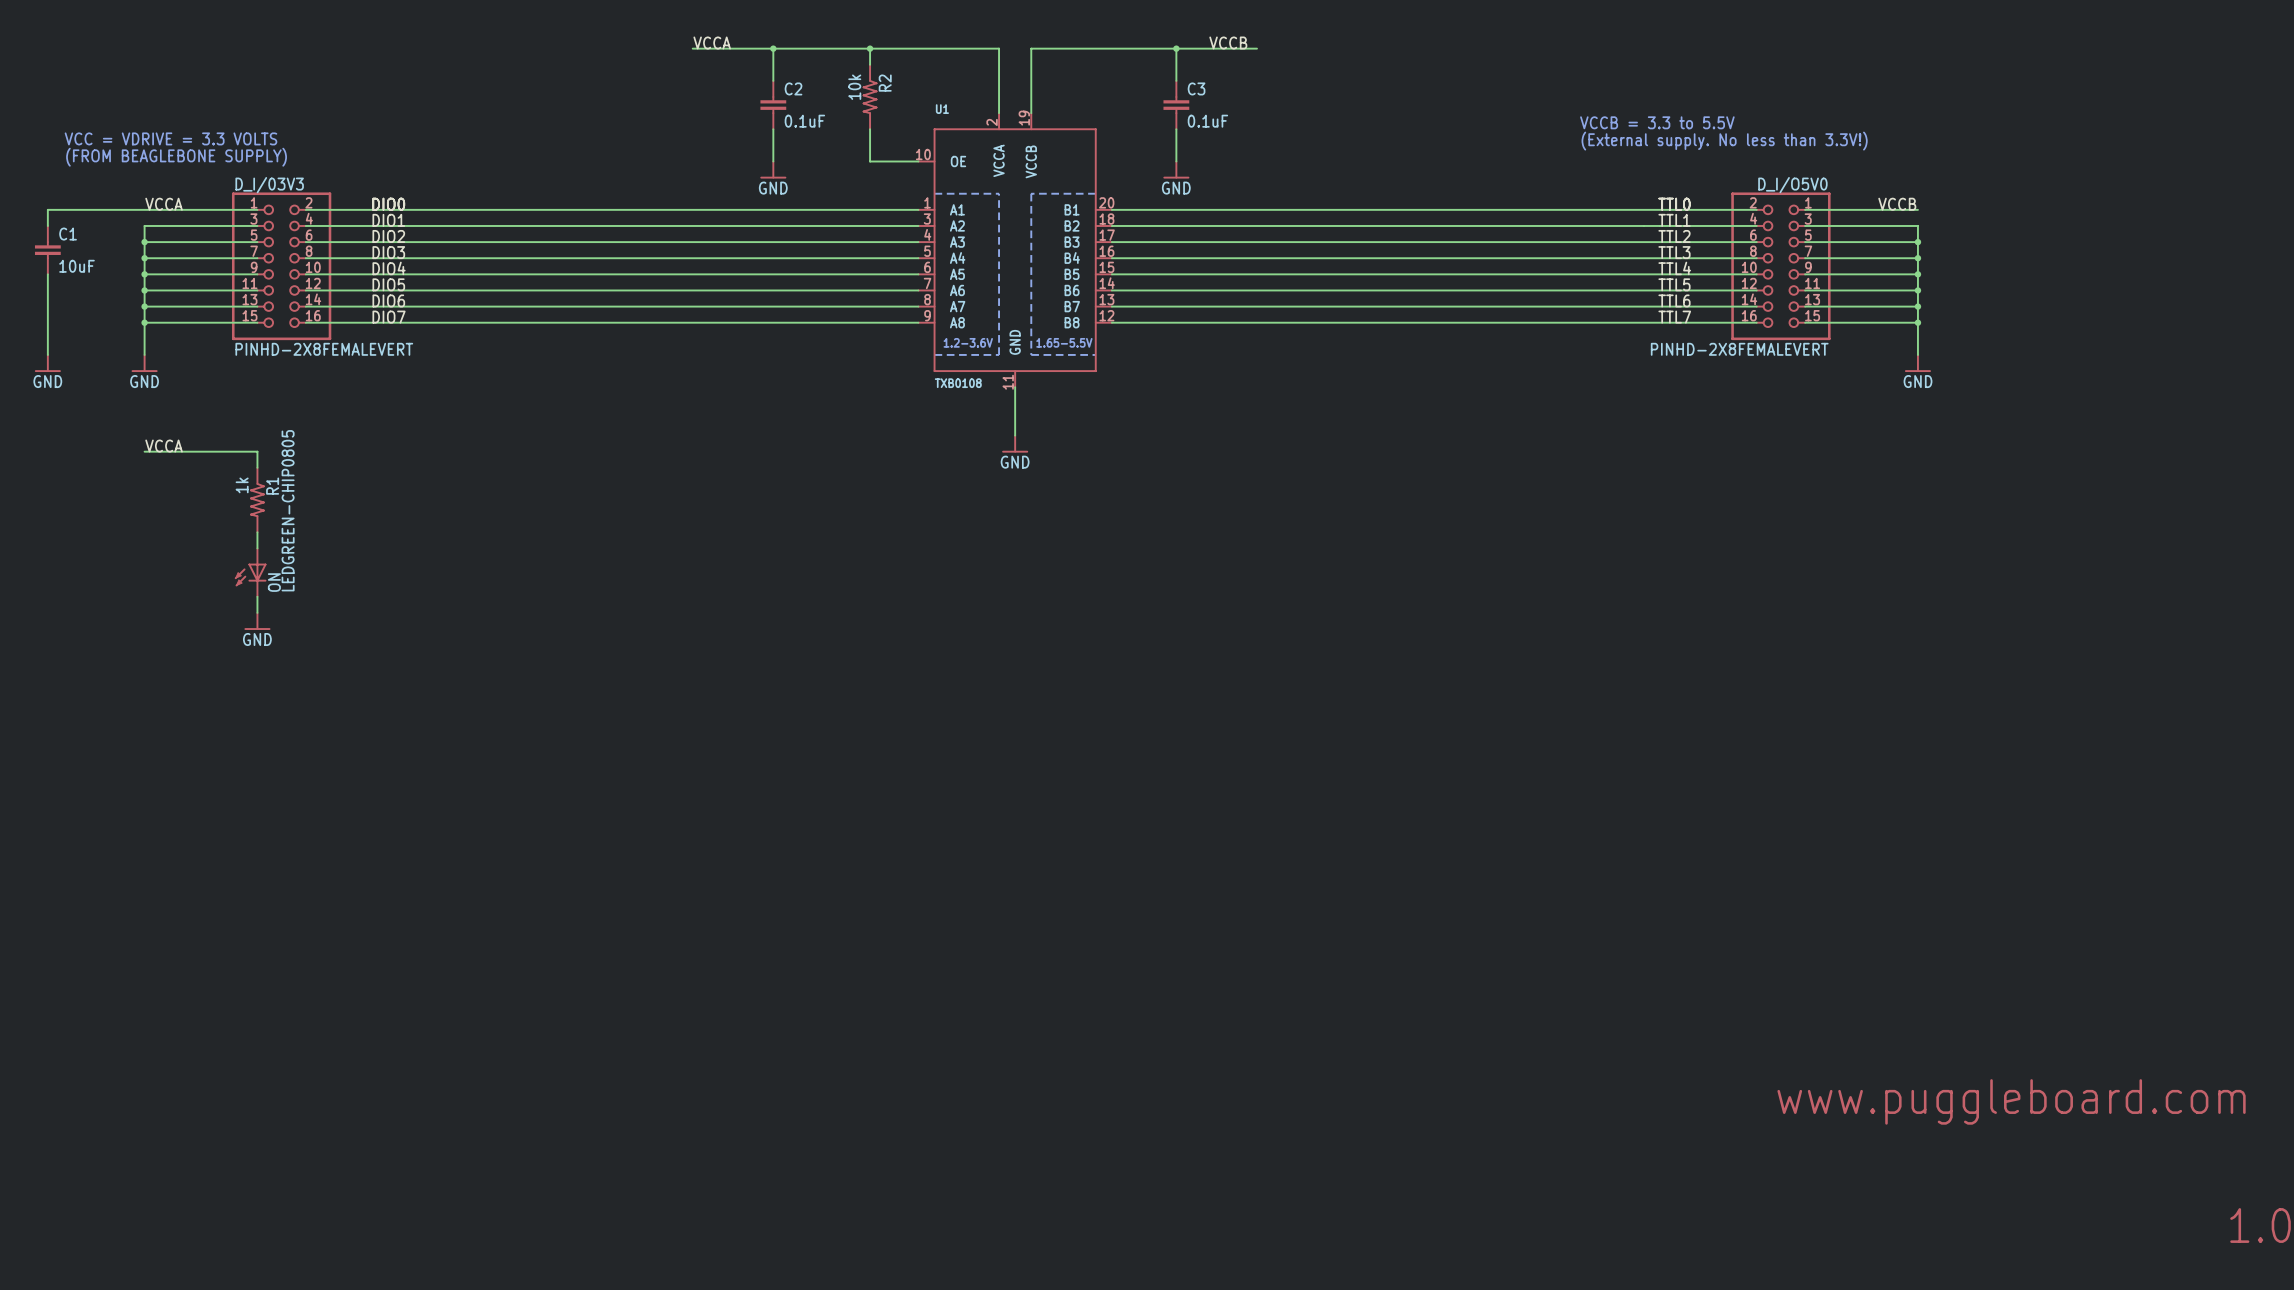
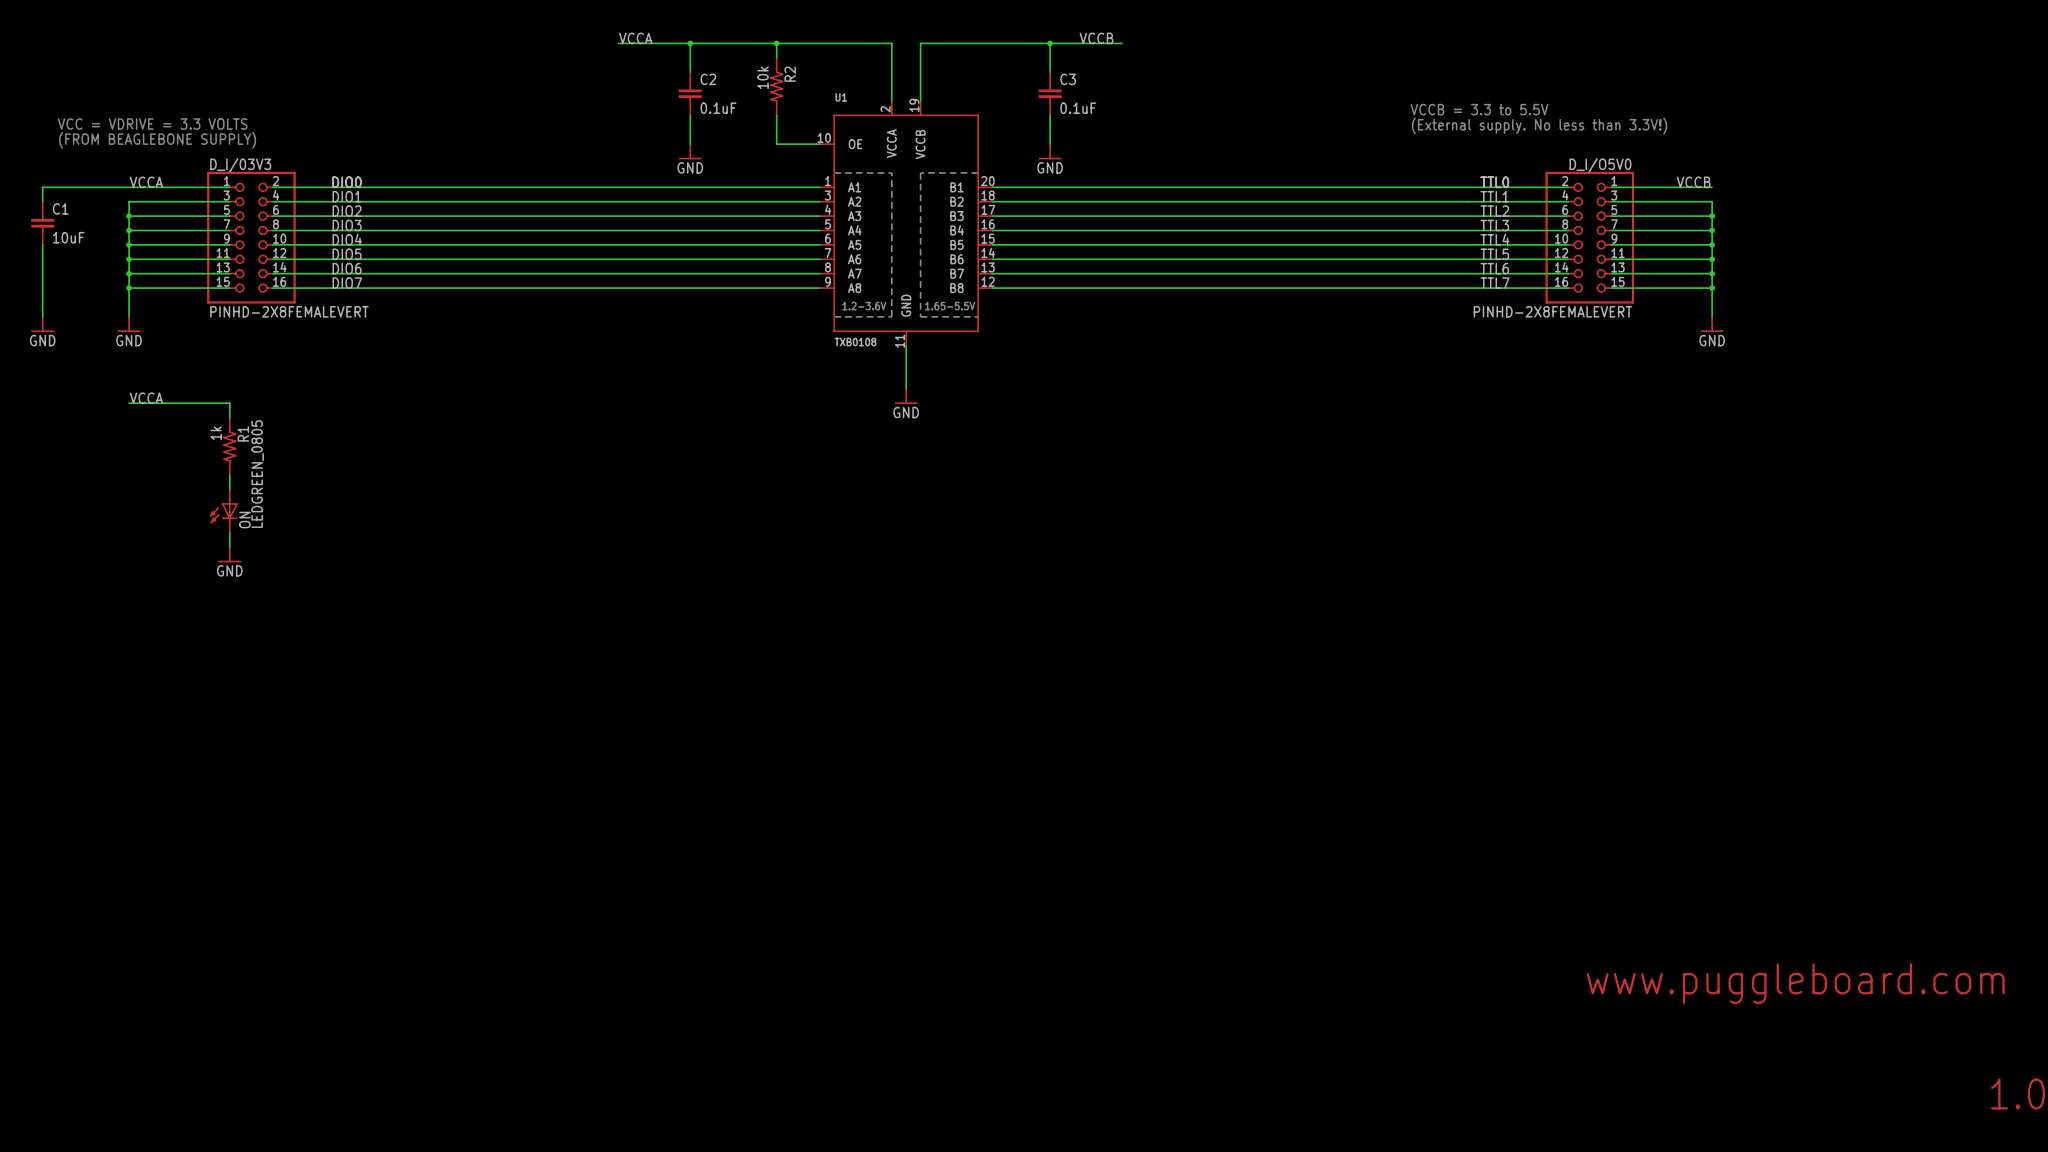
ON value: LEDGREEN-CHIP0805 (288, 510) -> LEDGREEN_0805 (257, 474)

